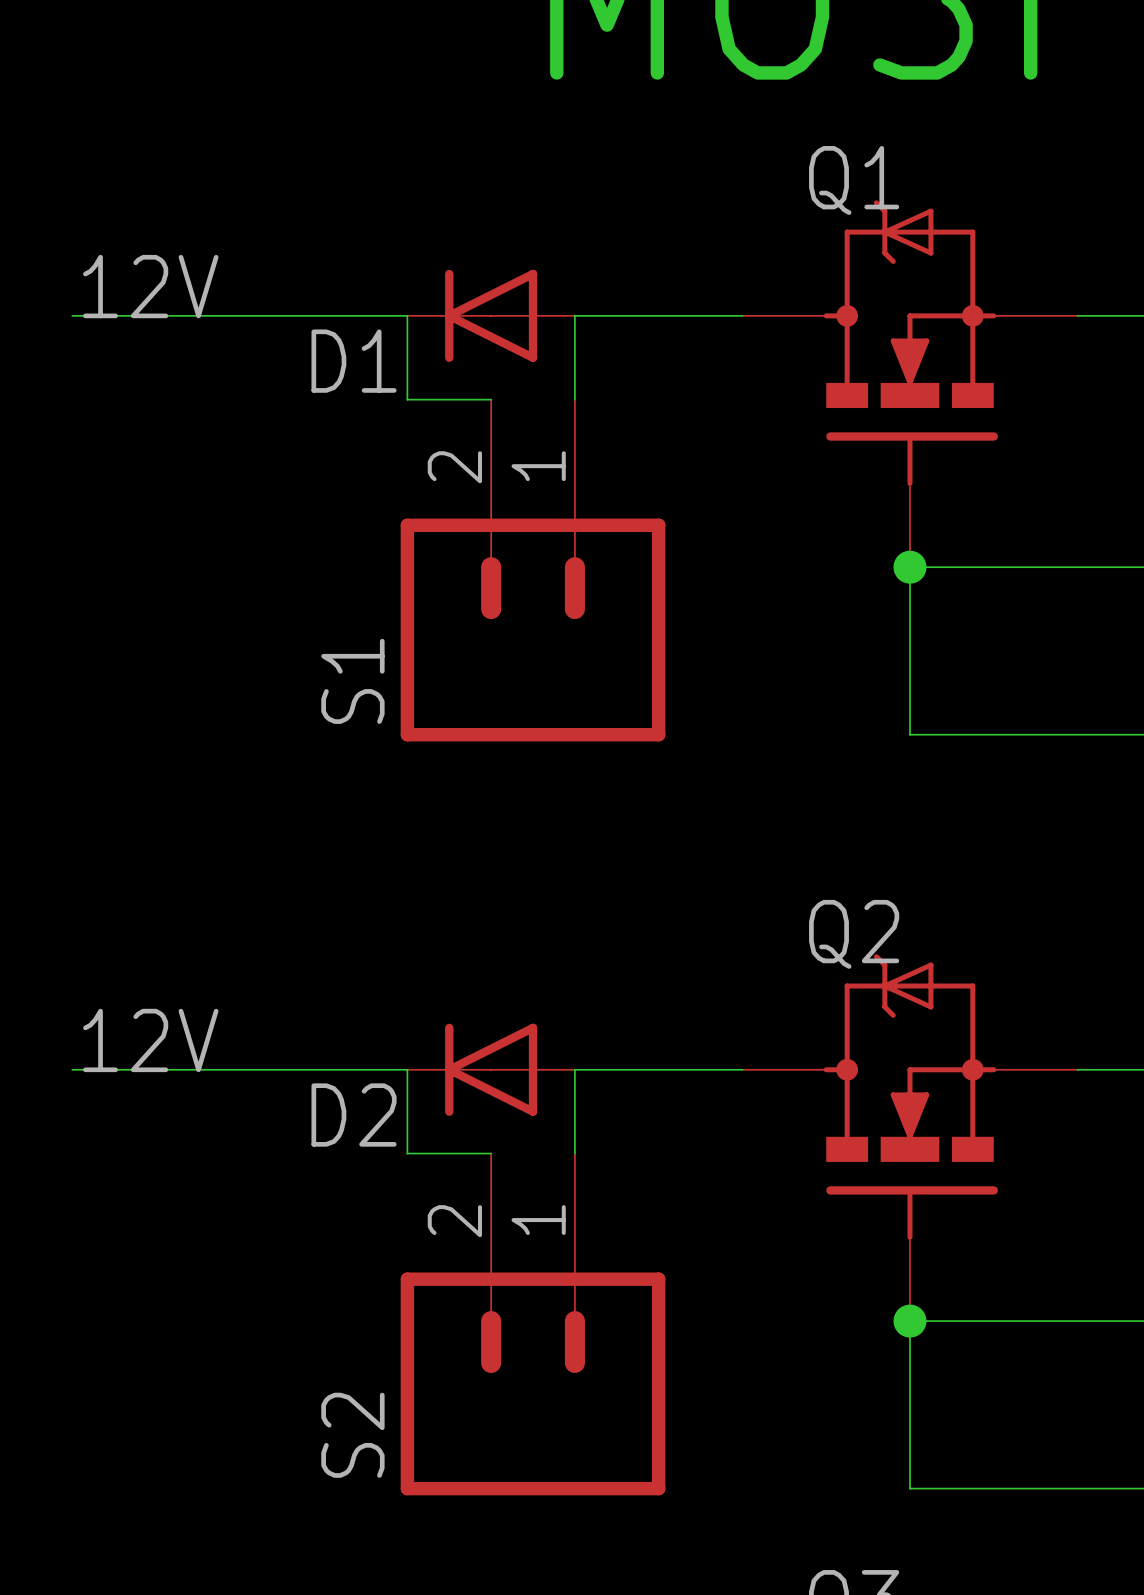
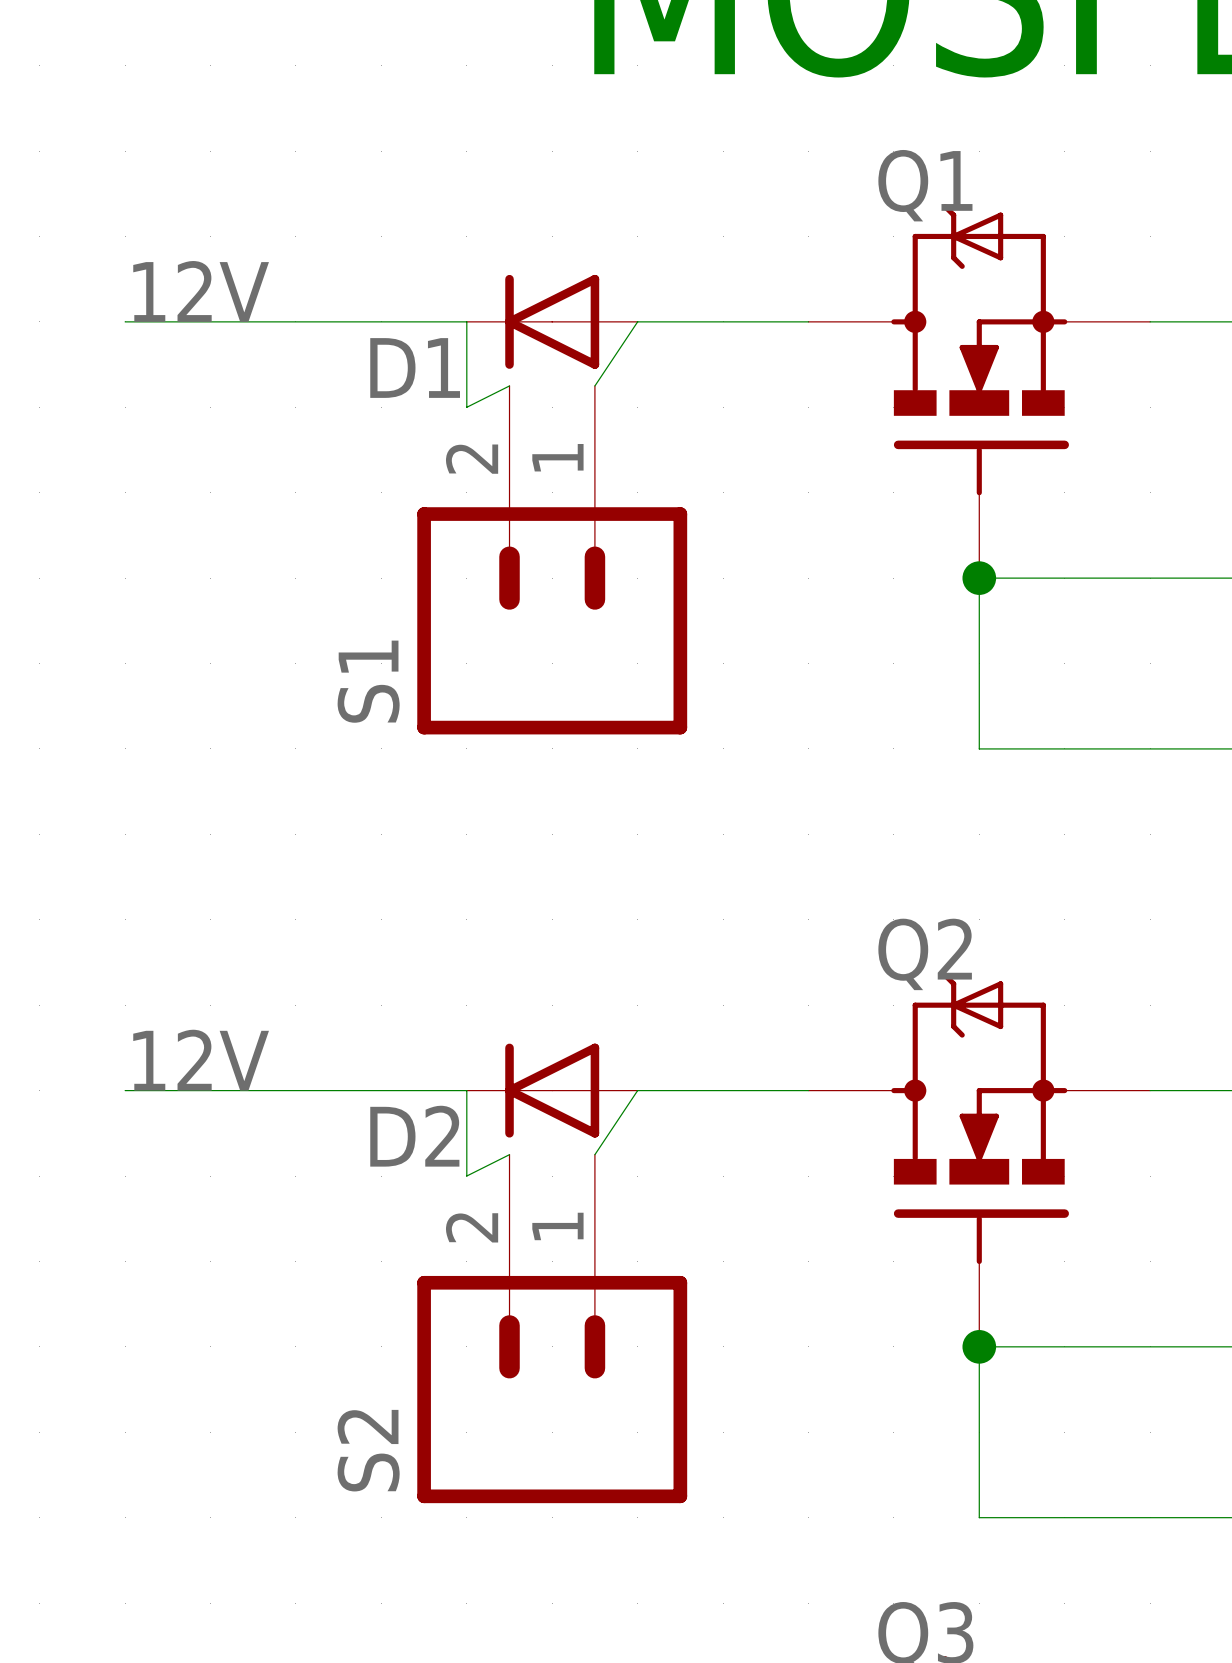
wire: (574, 315) (574, 399) -> (637, 321) (594, 385)
wire: (407, 399) (491, 399) -> (466, 407) (509, 385)
S1 position: (533, 570) -> (552, 560)
wire: (574, 1069) (574, 1153) -> (637, 1090) (594, 1154)
wire: (407, 1153) (491, 1153) -> (466, 1176) (509, 1154)
S2 position: (533, 1324) -> (552, 1328)

